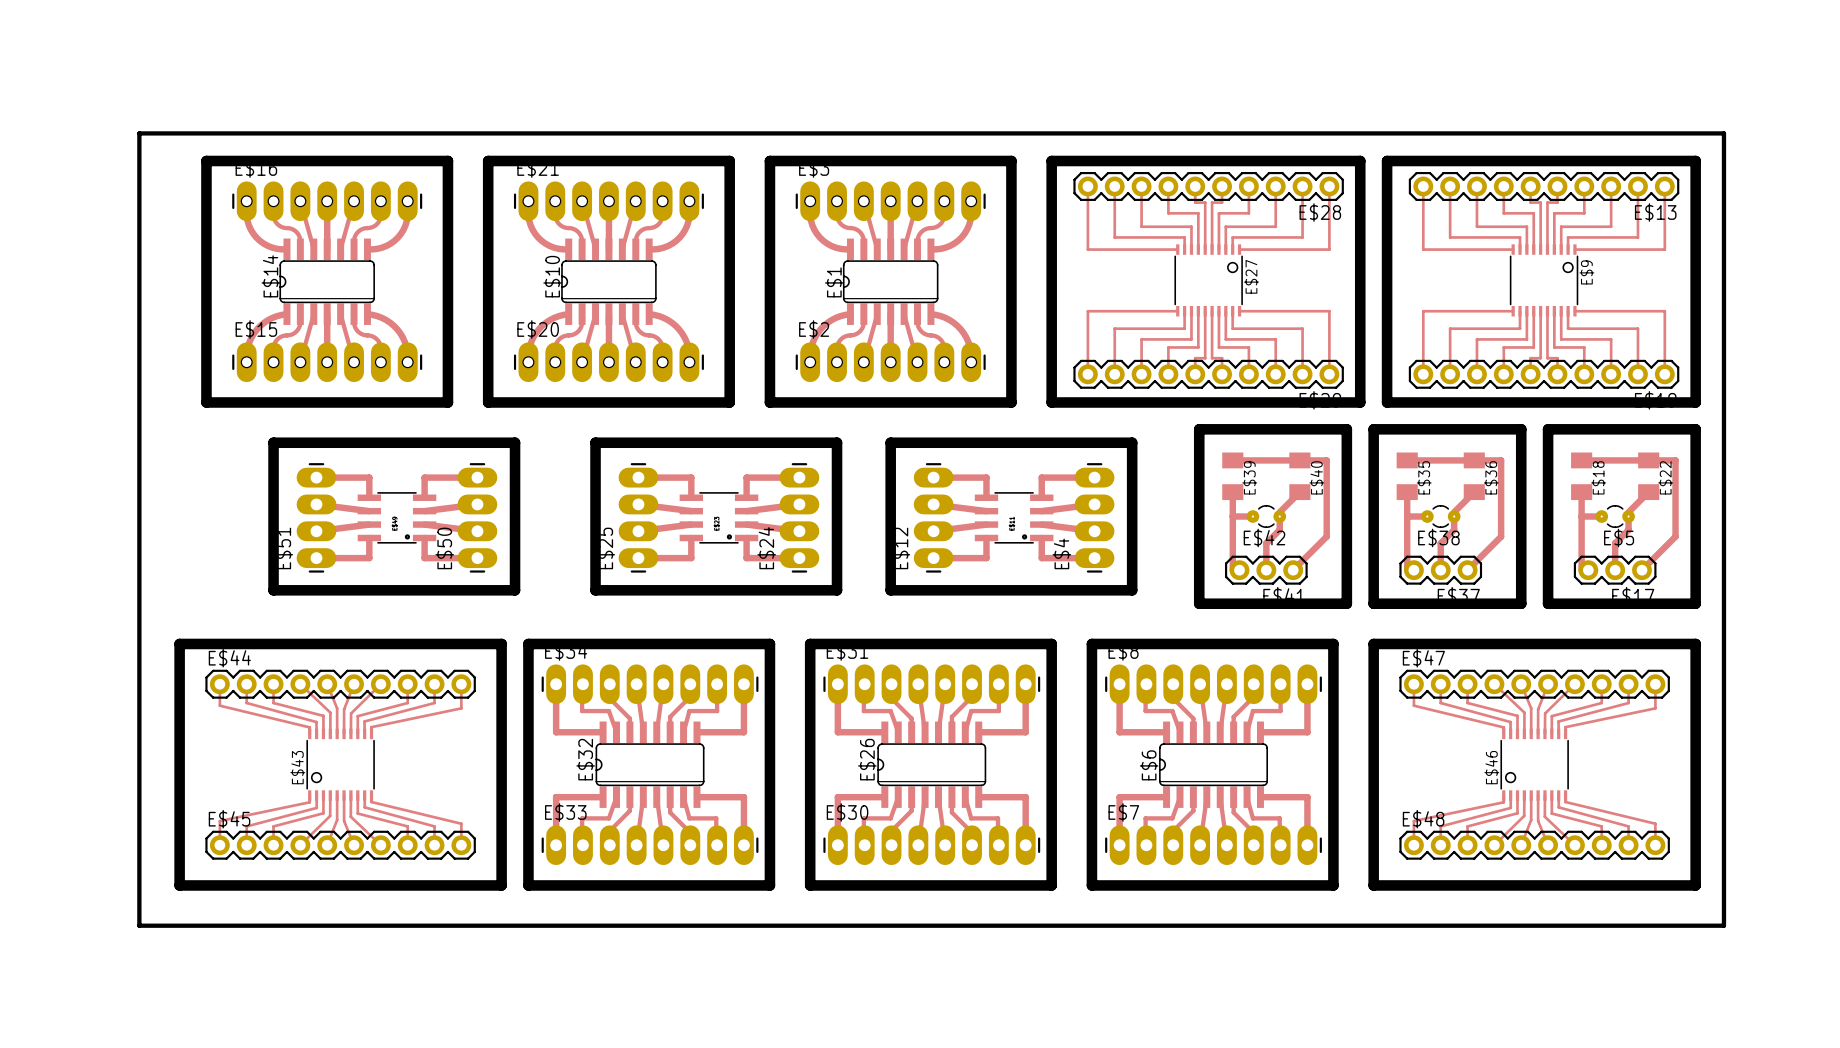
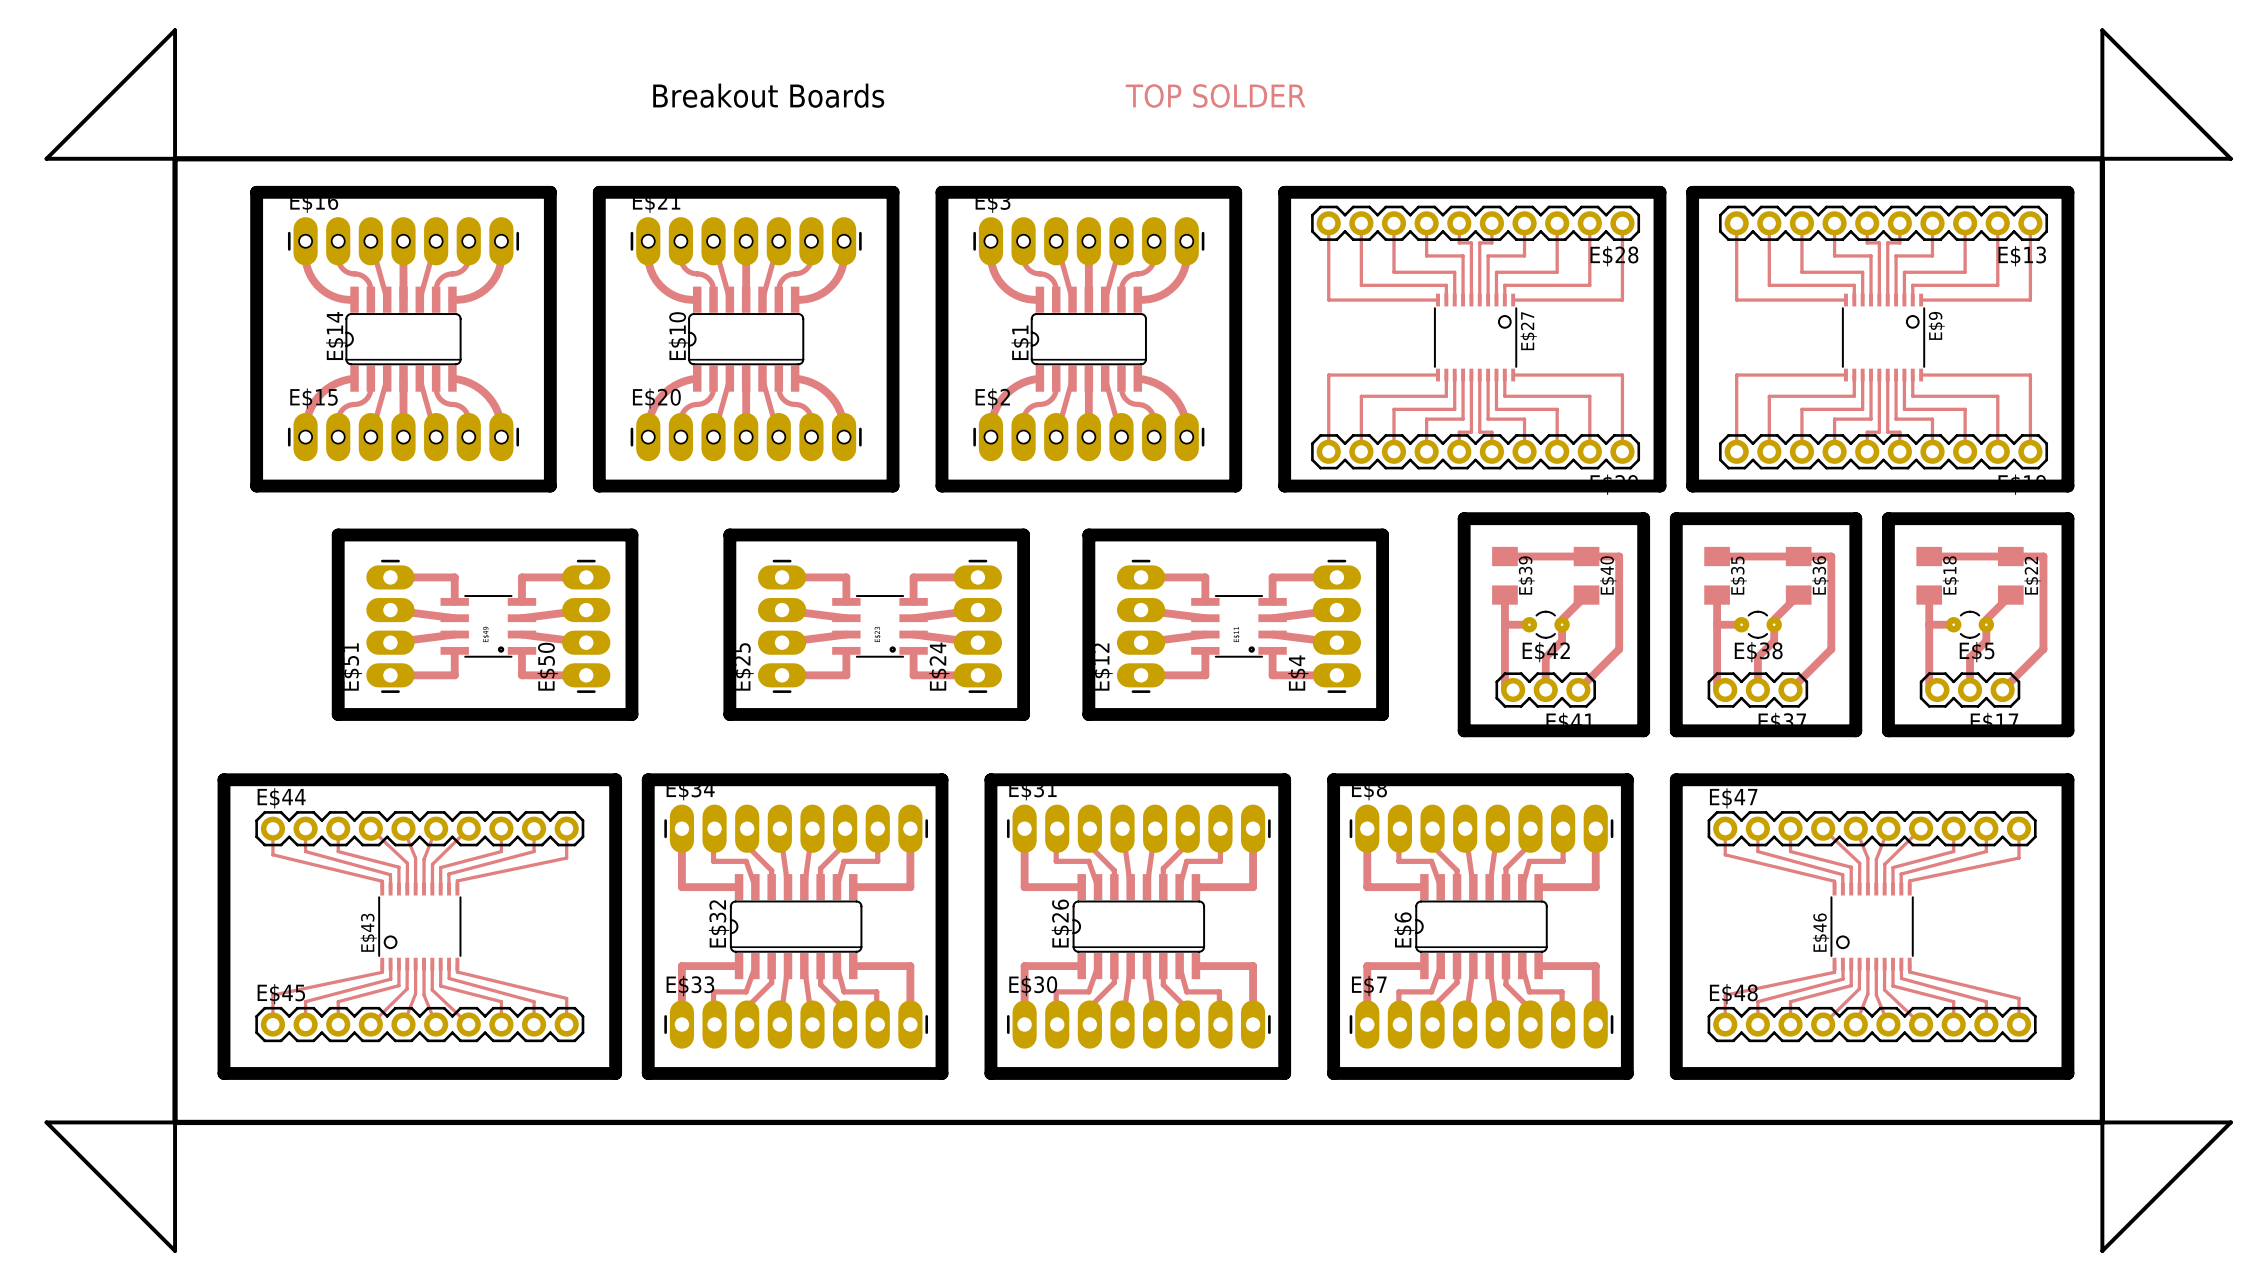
board edge: none -> (175, 30) (175, 158) (46, 158) (175, 30)
board edge: none -> (2102, 30) (2102, 158) (2230, 158) (2102, 30)
text: none -> Breakout Boards (768, 95)
text: none -> TOP SOLDER (1215, 95)
board edge: none -> (46, 1122) (175, 1122) (175, 1250) (46, 1122)
board edge: none -> (2102, 1122) (2230, 1122) (2102, 1250) (2102, 1122)

